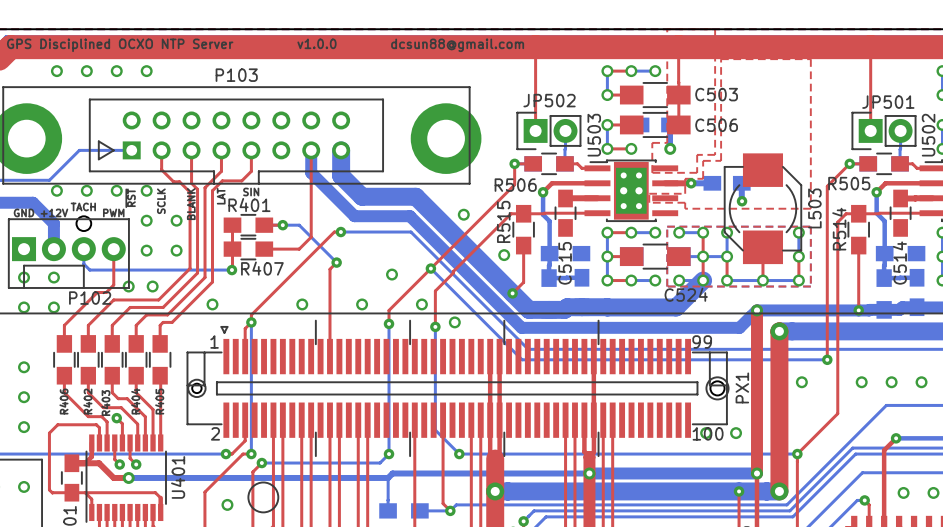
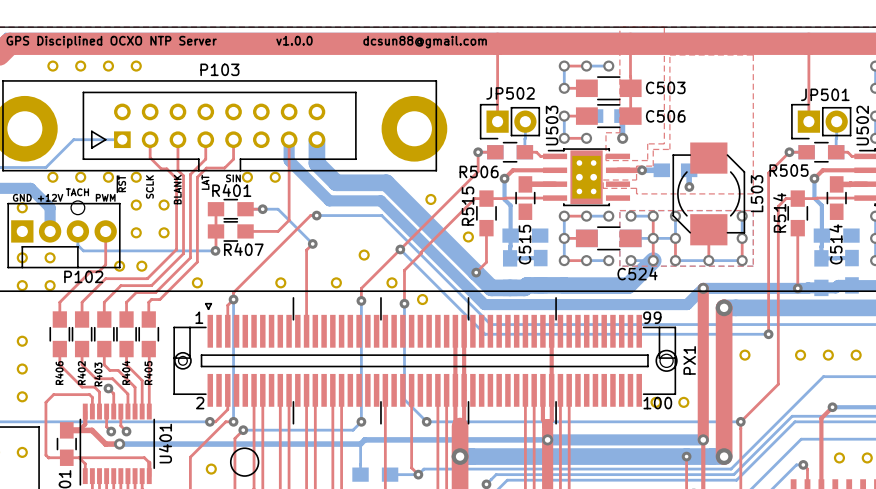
part: none -> (247, 177)
part: none -> (275, 177)
part: none -> (22, 207)

